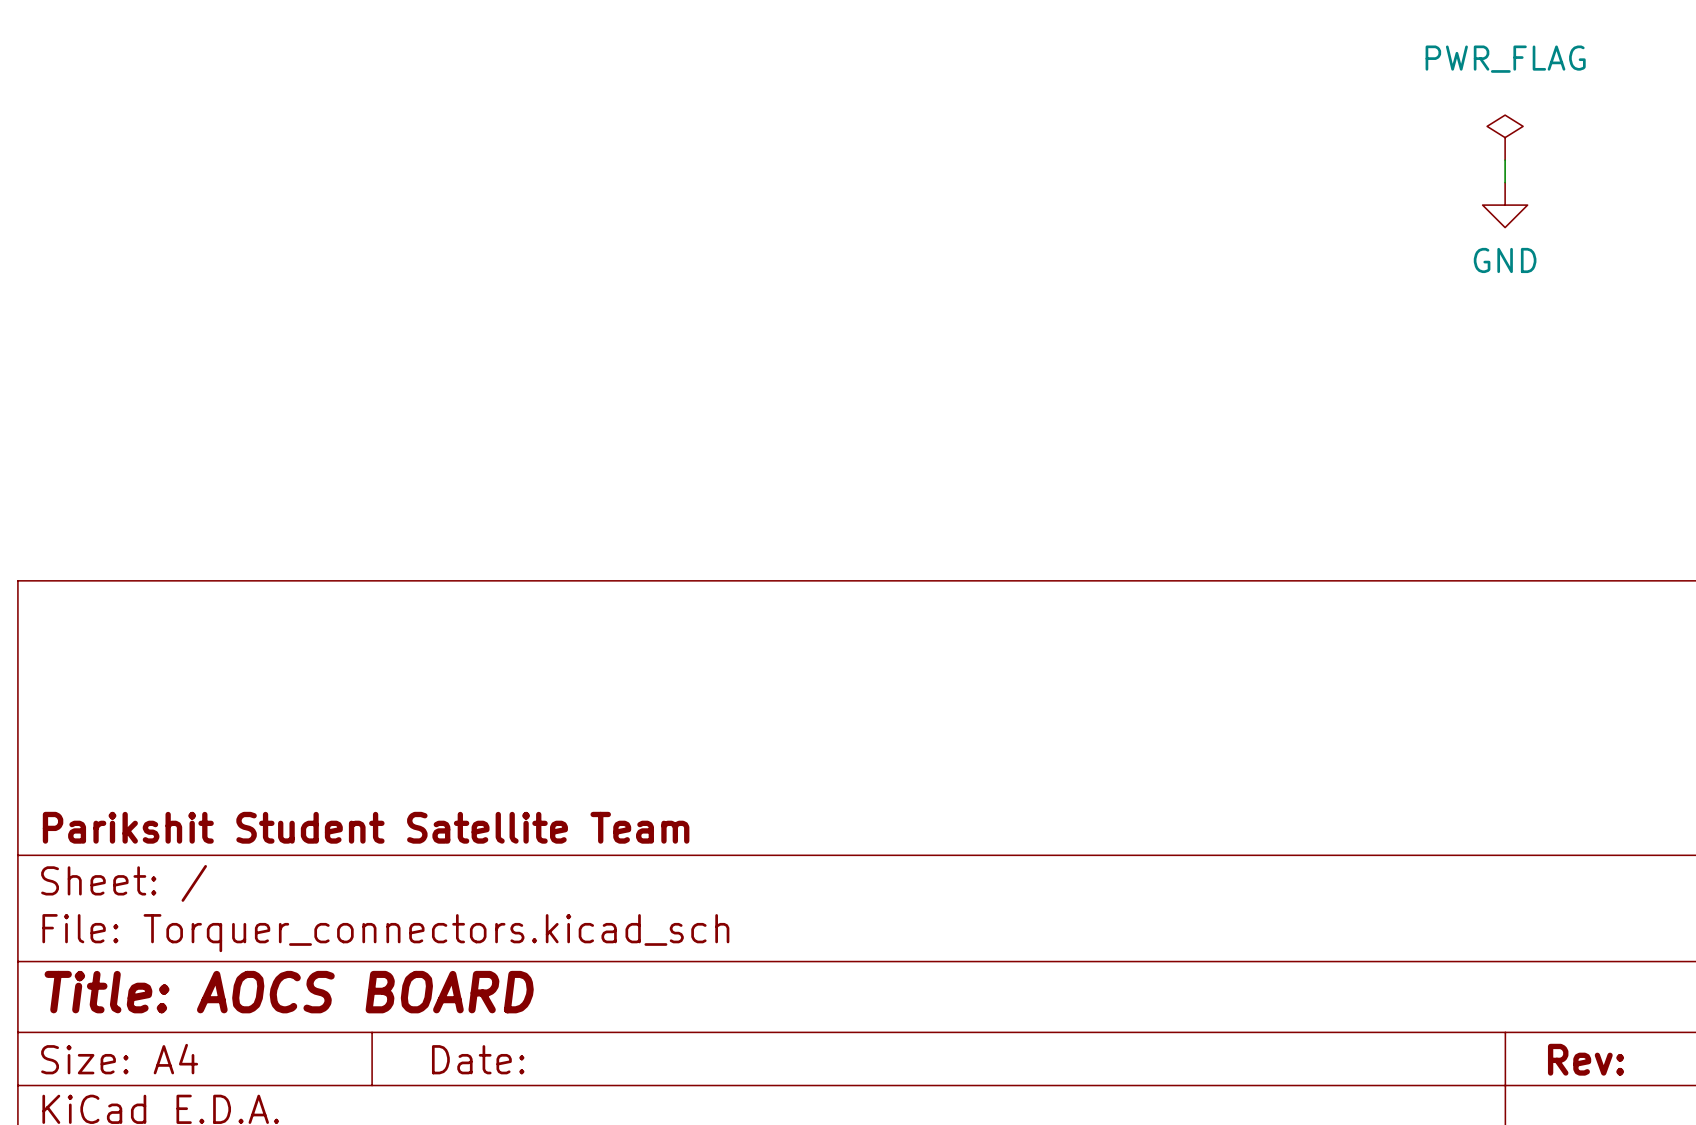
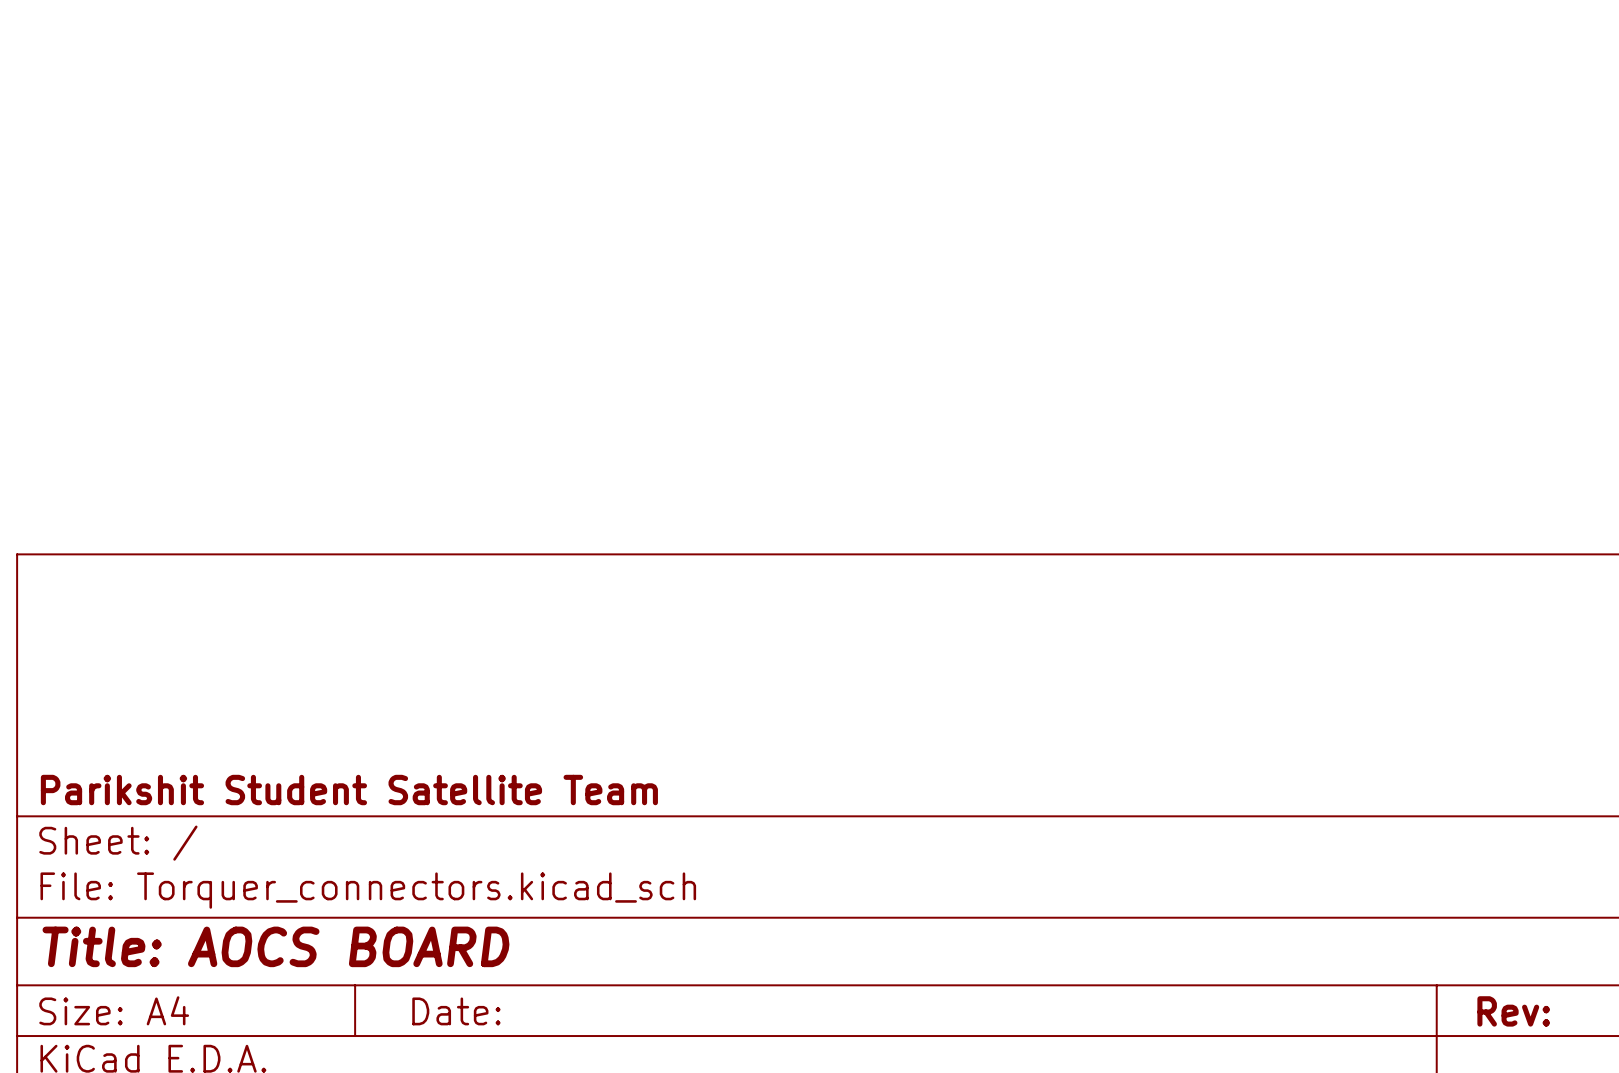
power symbol: PWR_FLAG (1505, 137) -> none
wire: (1505, 160) (1505, 182) -> none
power symbol: GND (1505, 205) -> none

